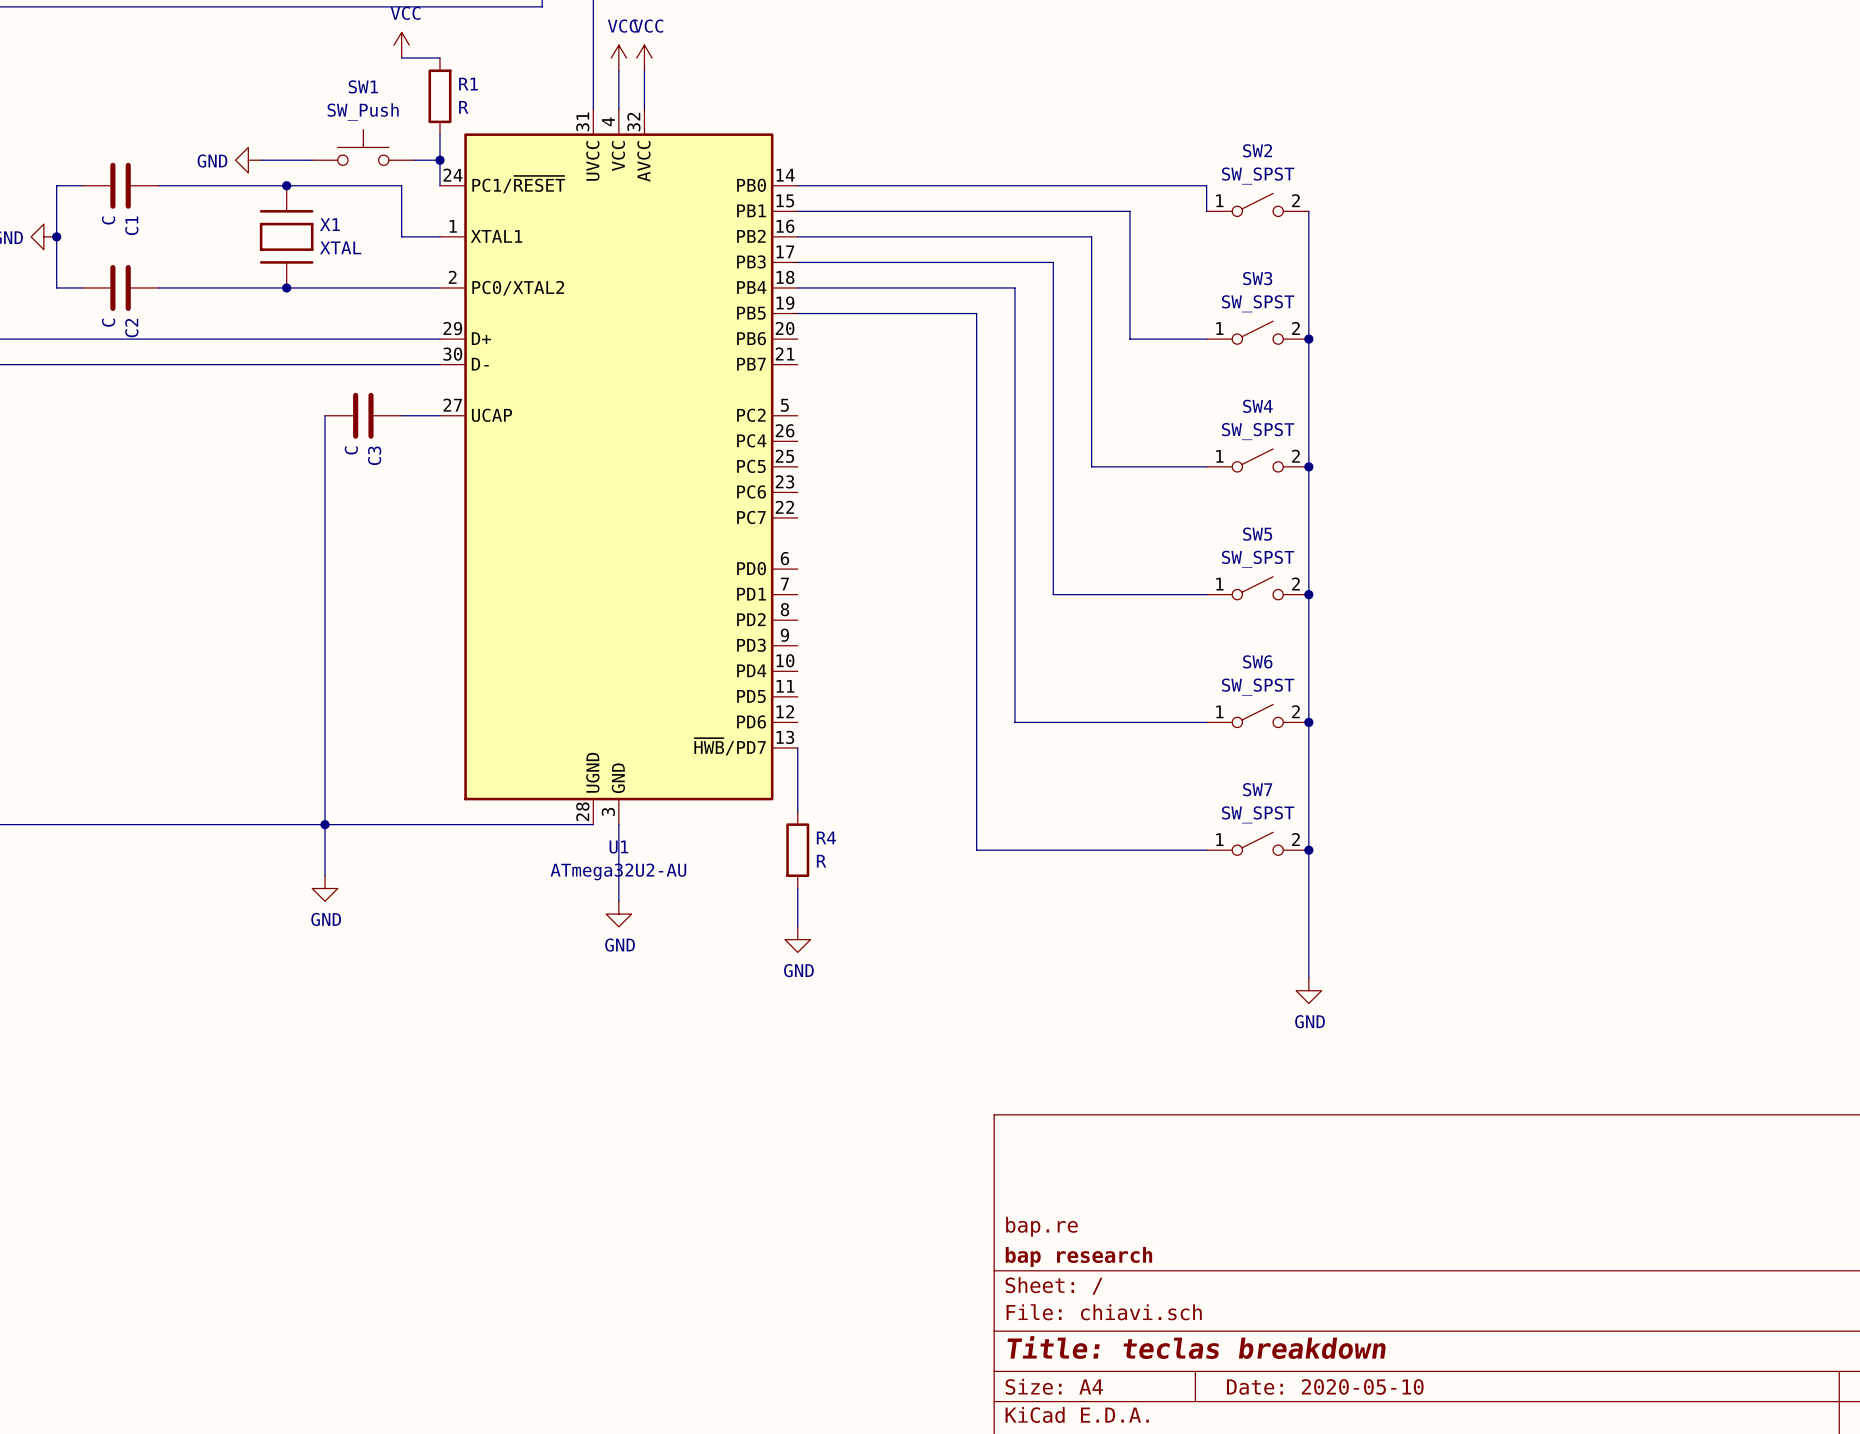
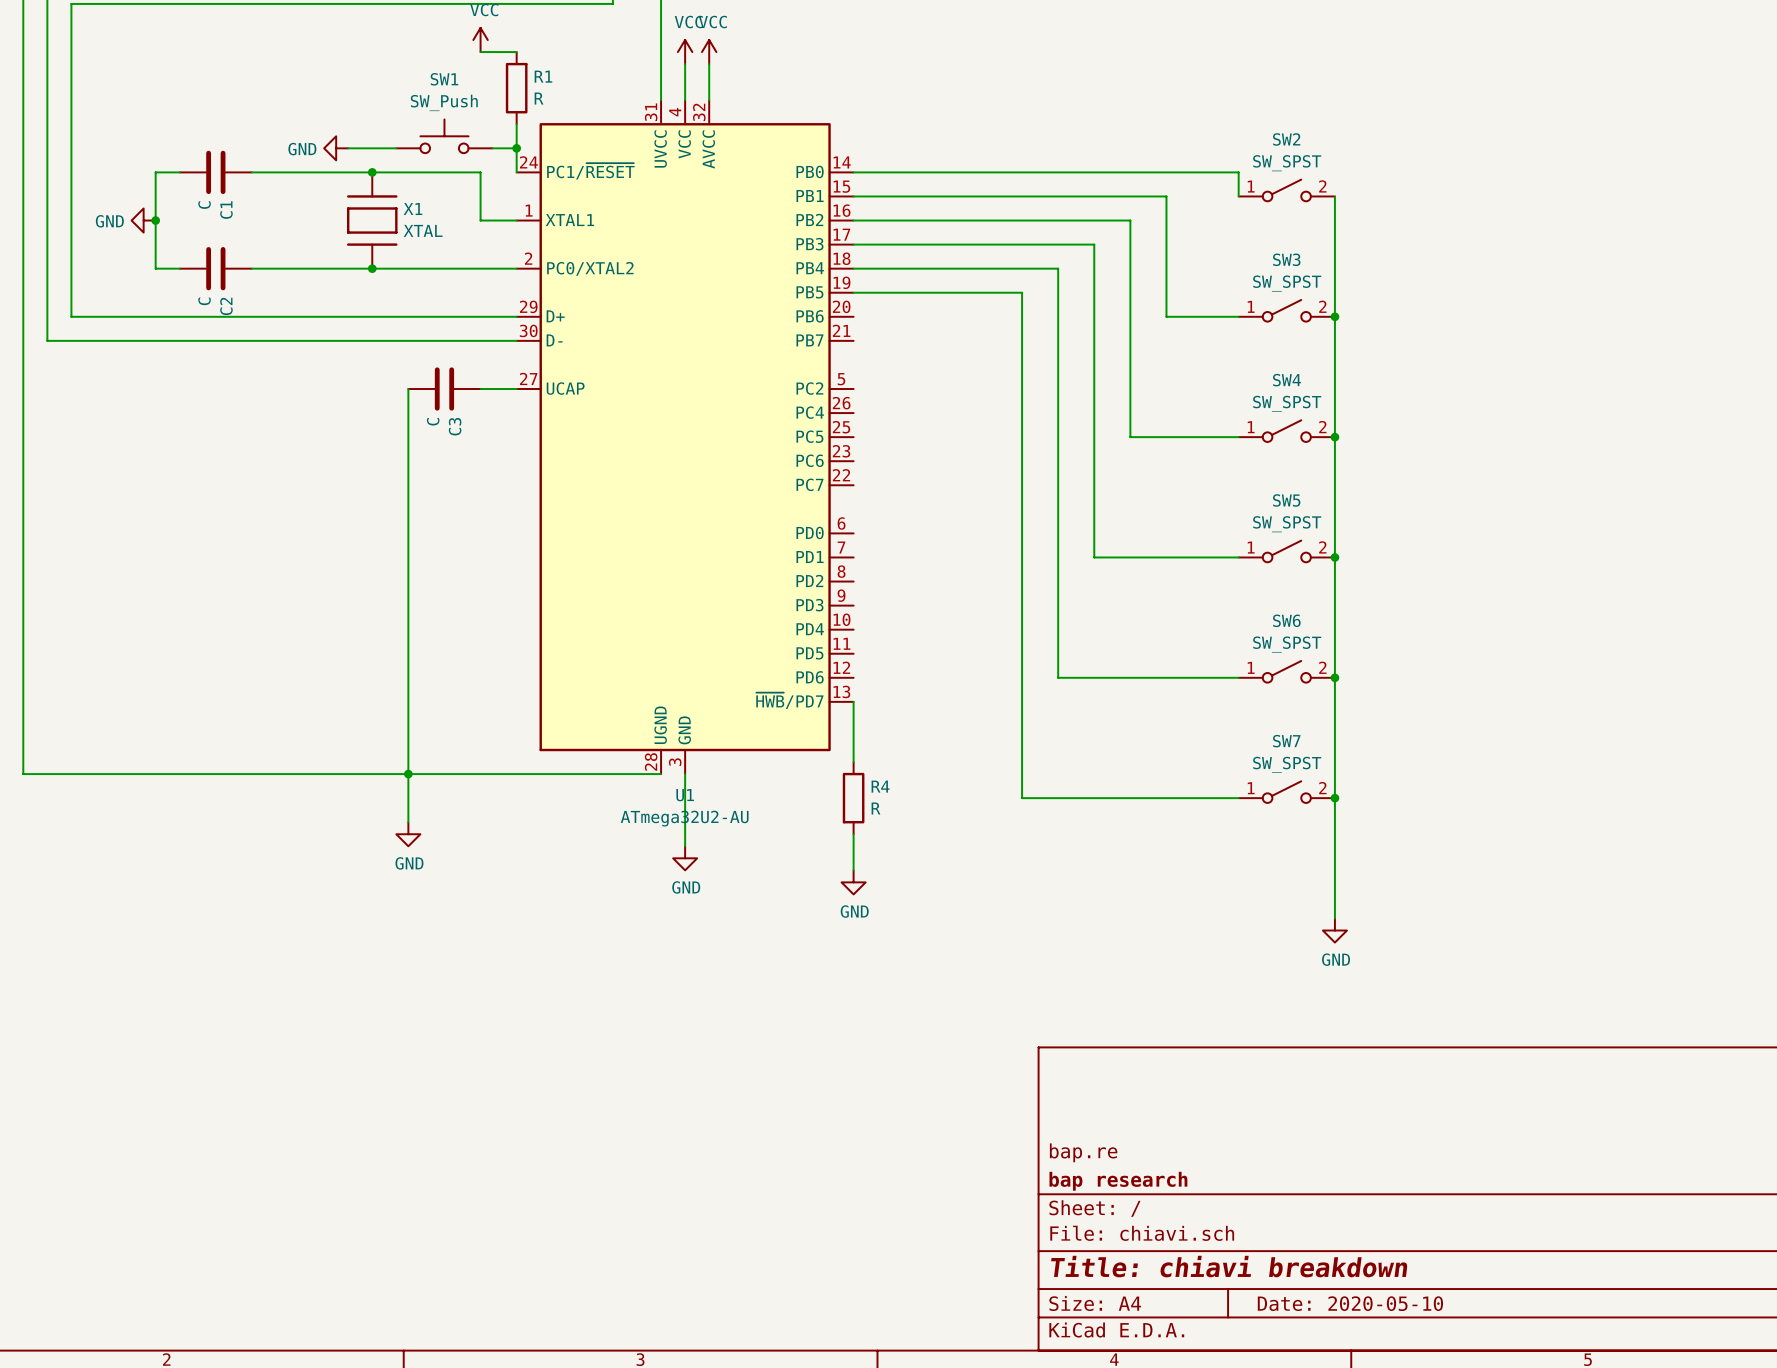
title block: Title: teclas breakdown (1196, 1347) -> Title: chiavi breakdown (1229, 1266)

